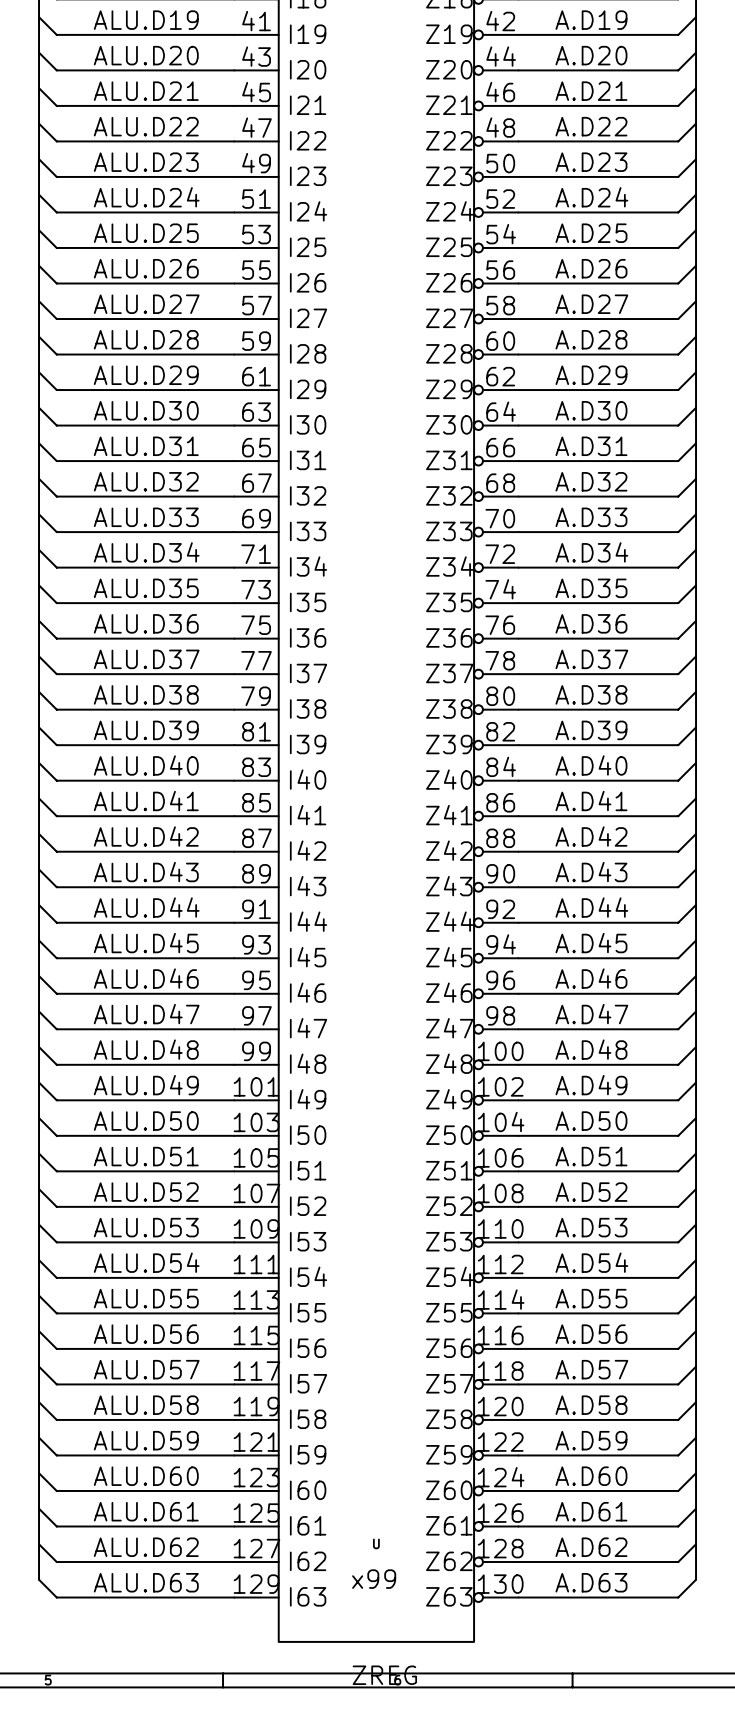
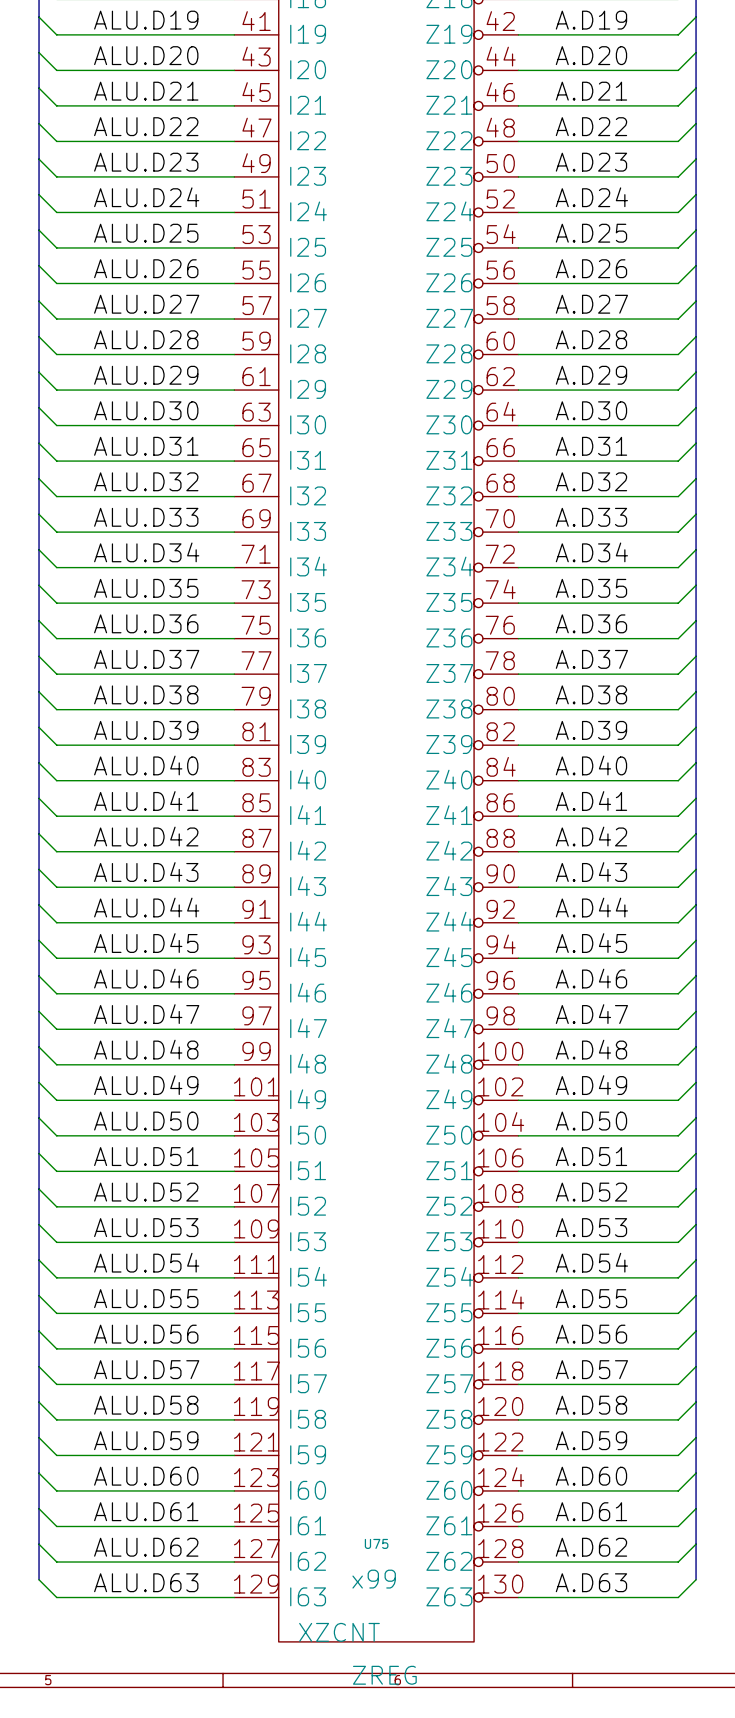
U name: U (376, 1543) -> U75 (376, 1543)
U value: none -> XZCNT (339, 1632)

